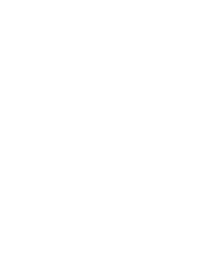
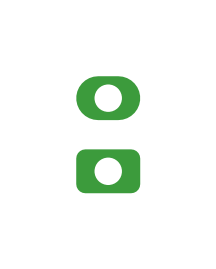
part: none -> (108, 134)

